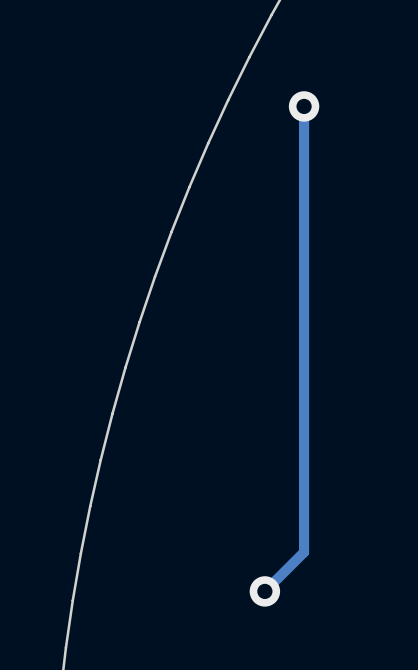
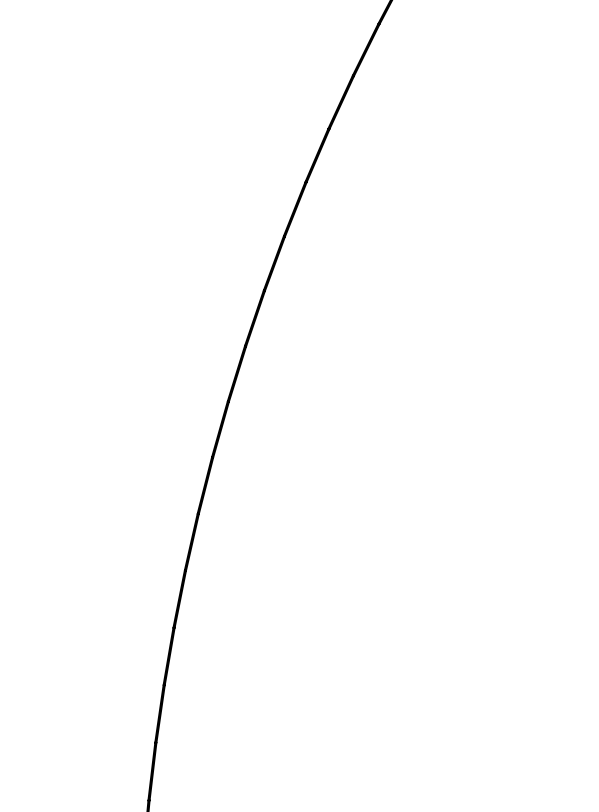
track: (304, 106) (304, 552) (264, 591) -> none
via: (304, 106) -> none
via: (264, 591) -> none

